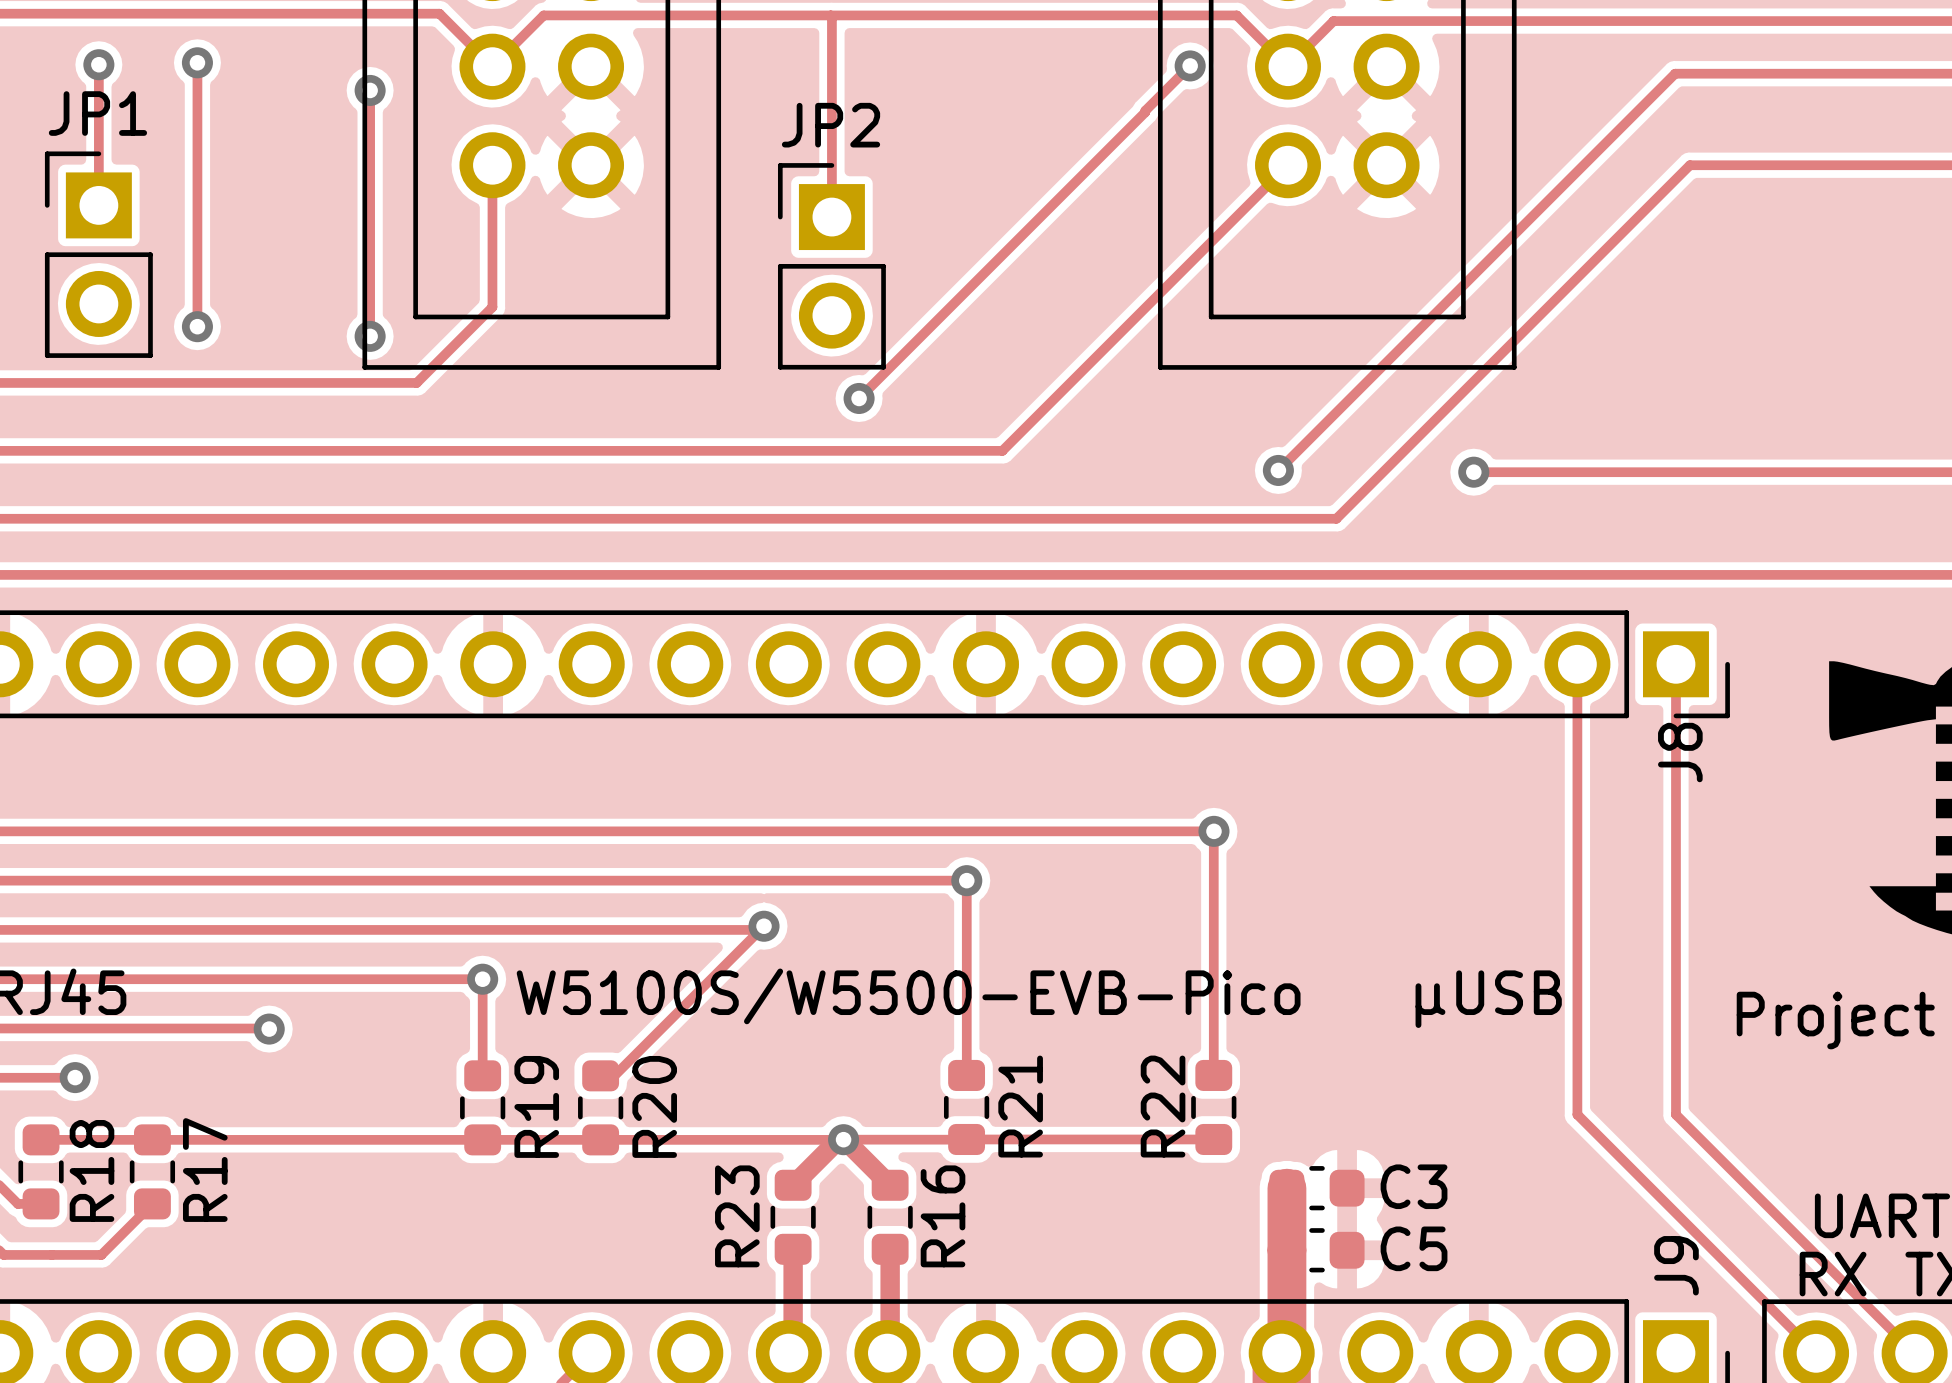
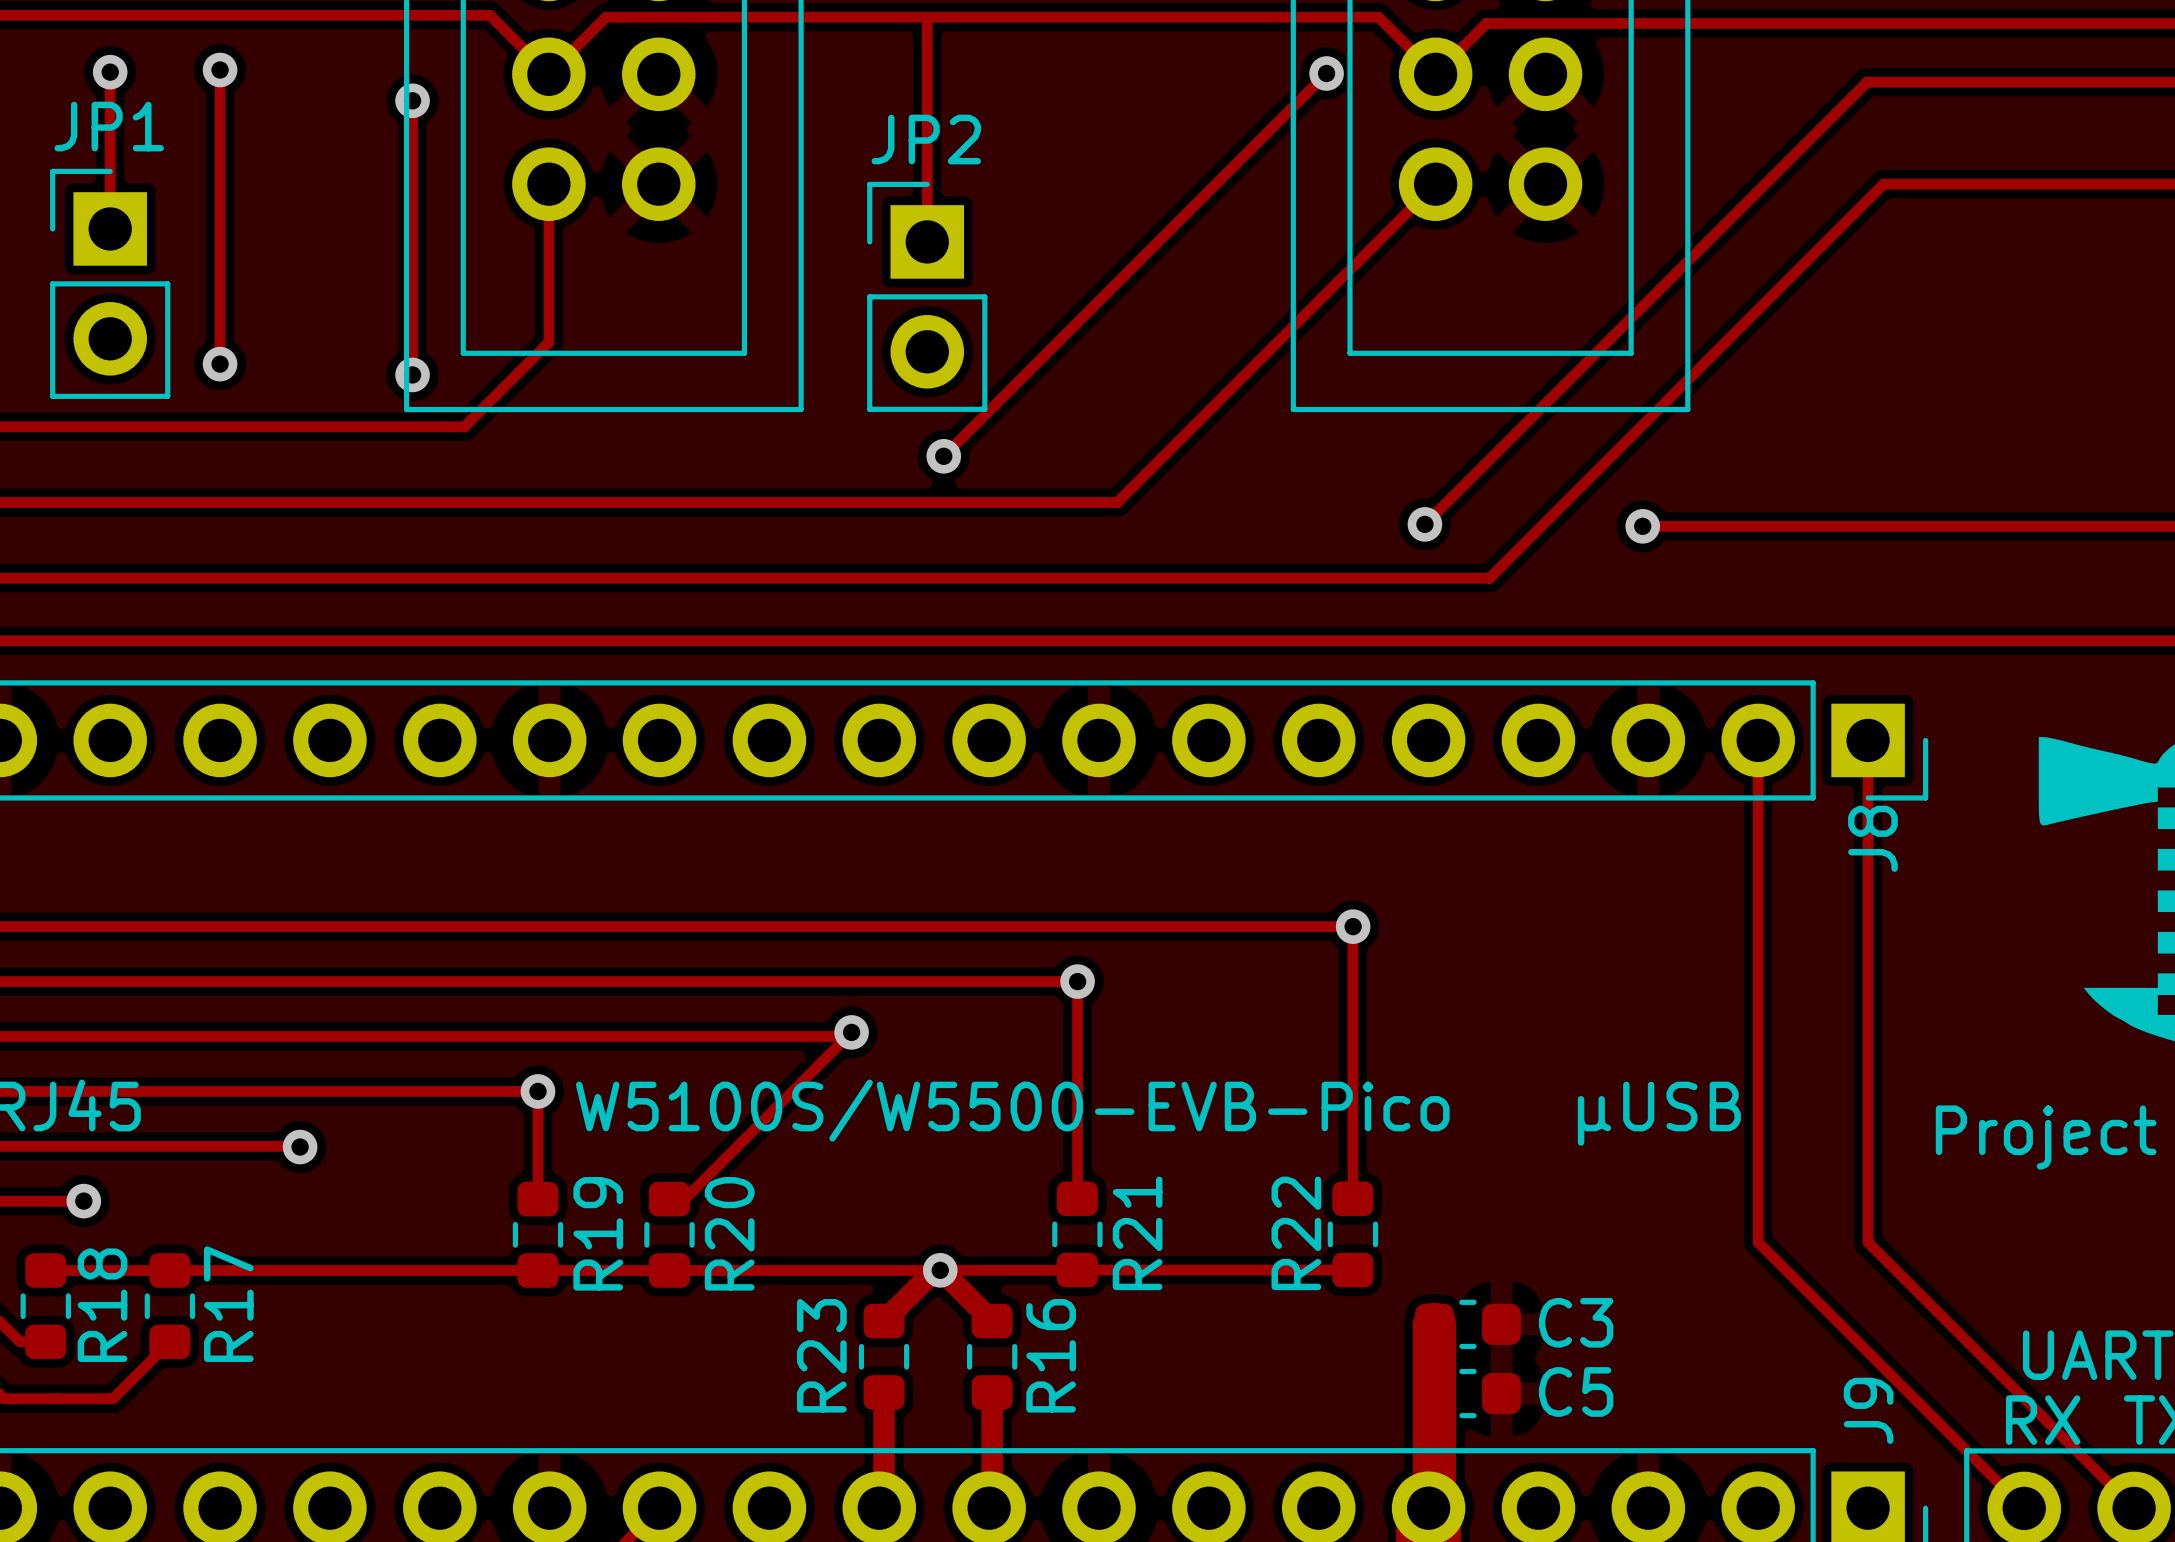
track: (1145, 110) (859, 398) -> (1276, 123) (943, 456)
via position: (859, 398) -> (943, 456)

